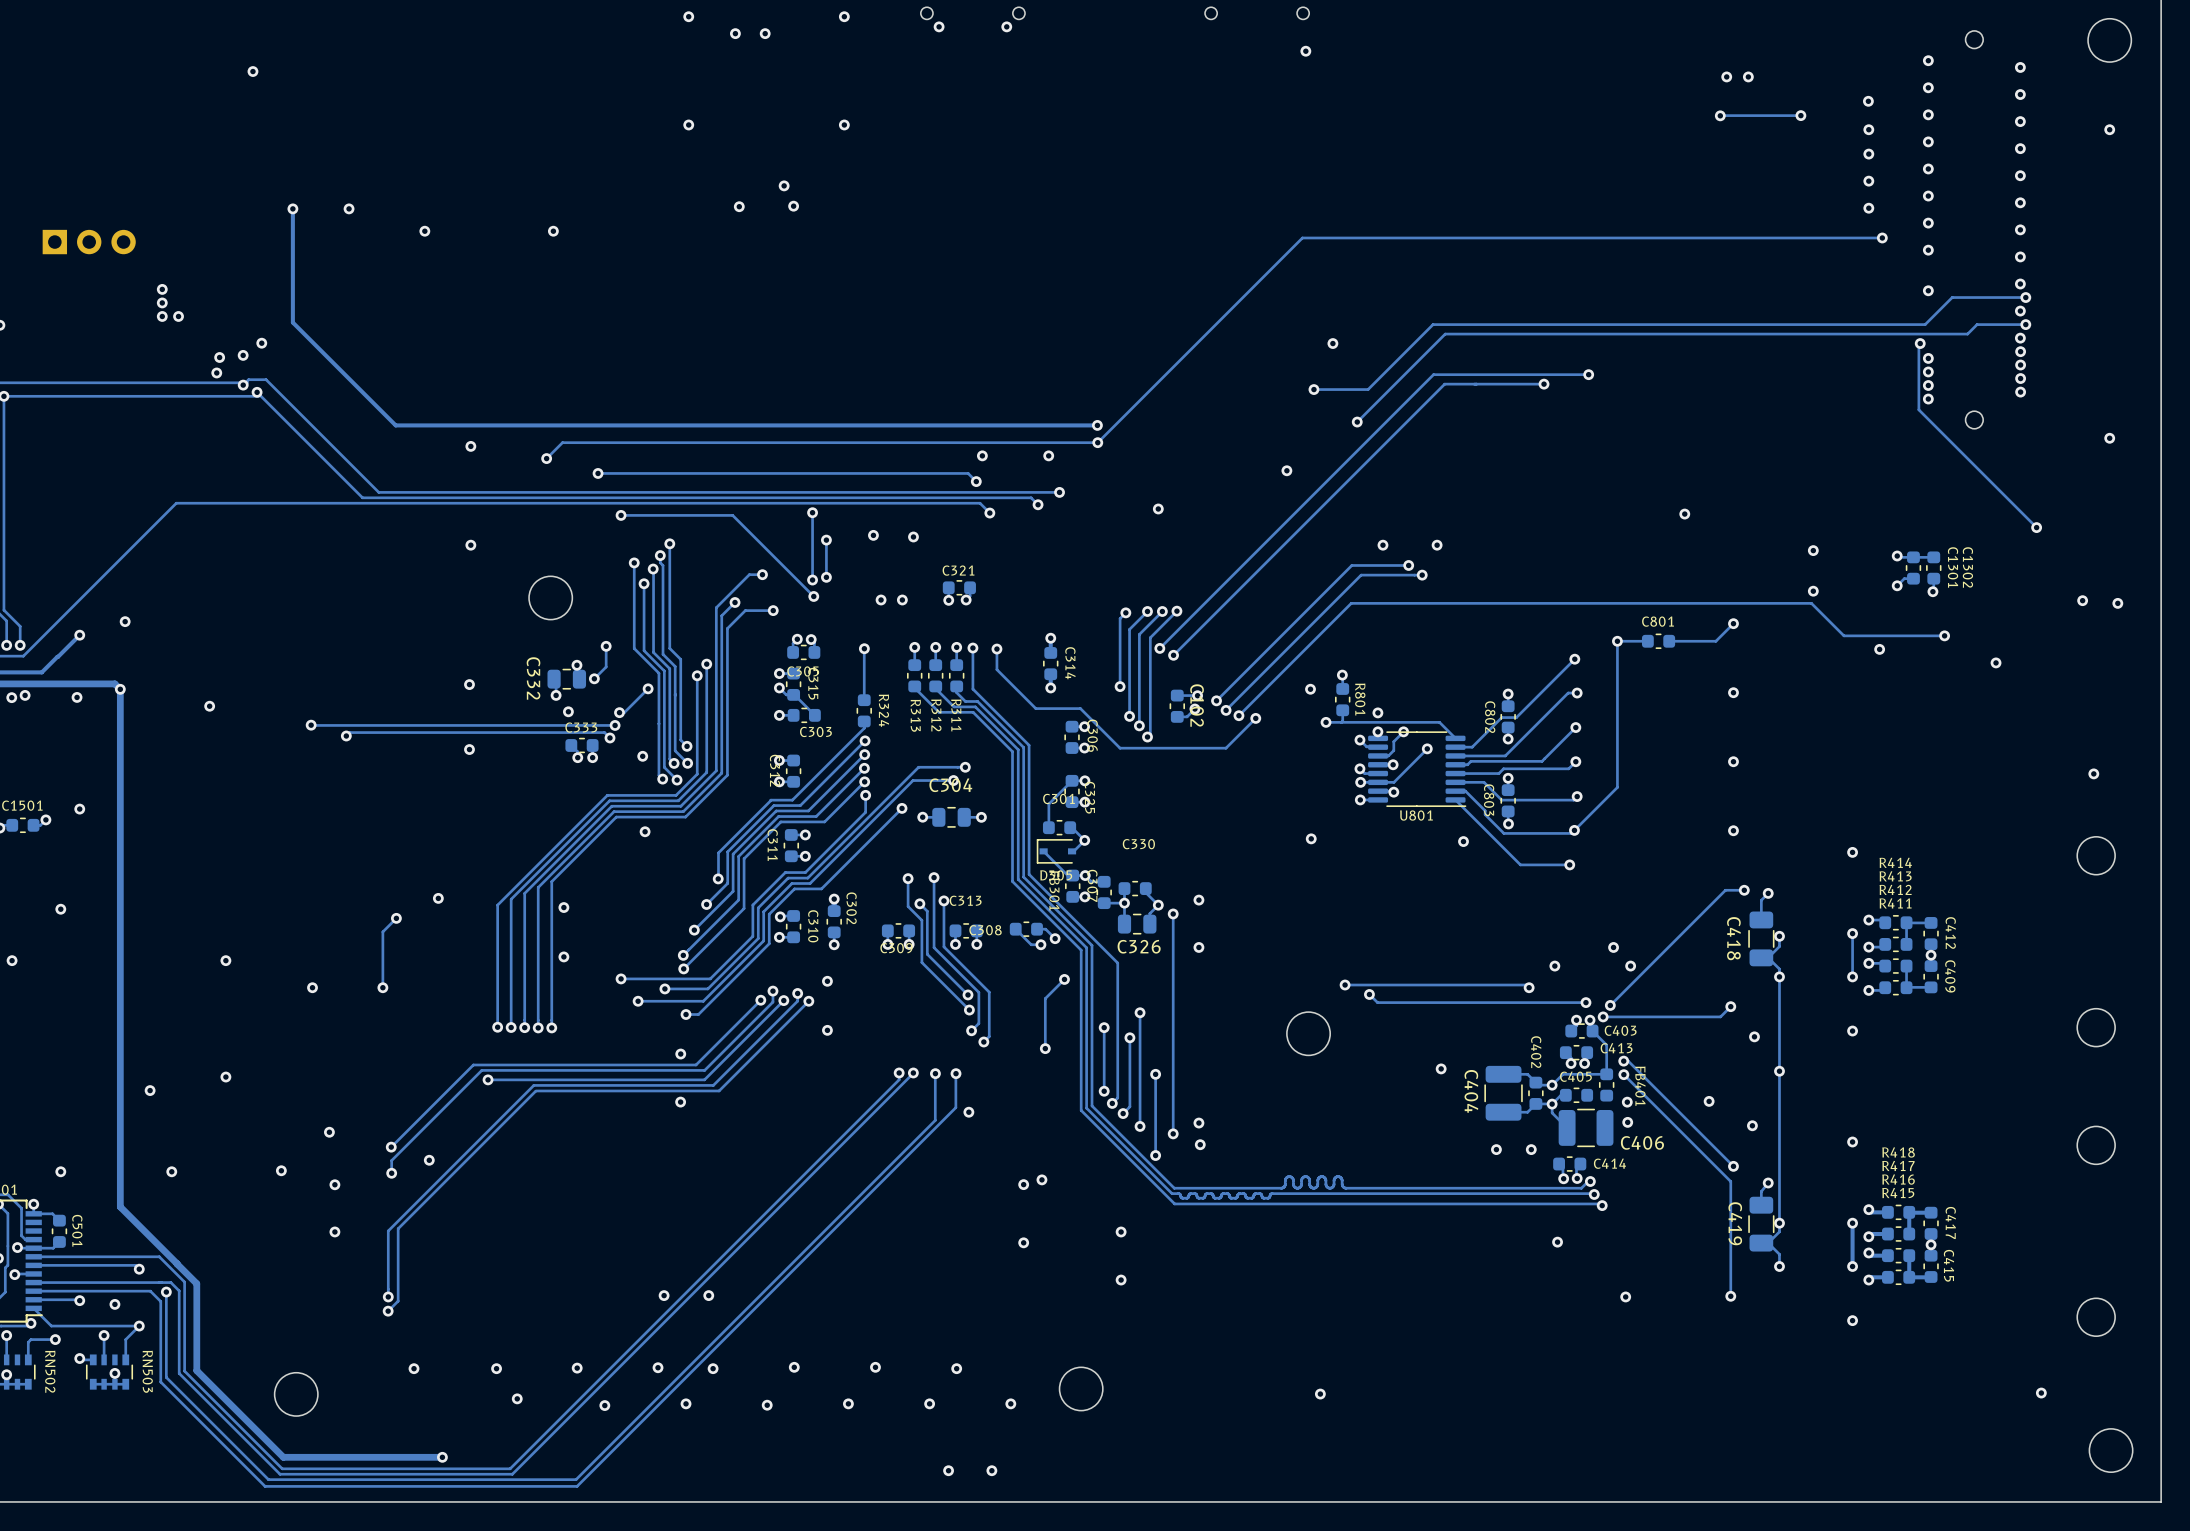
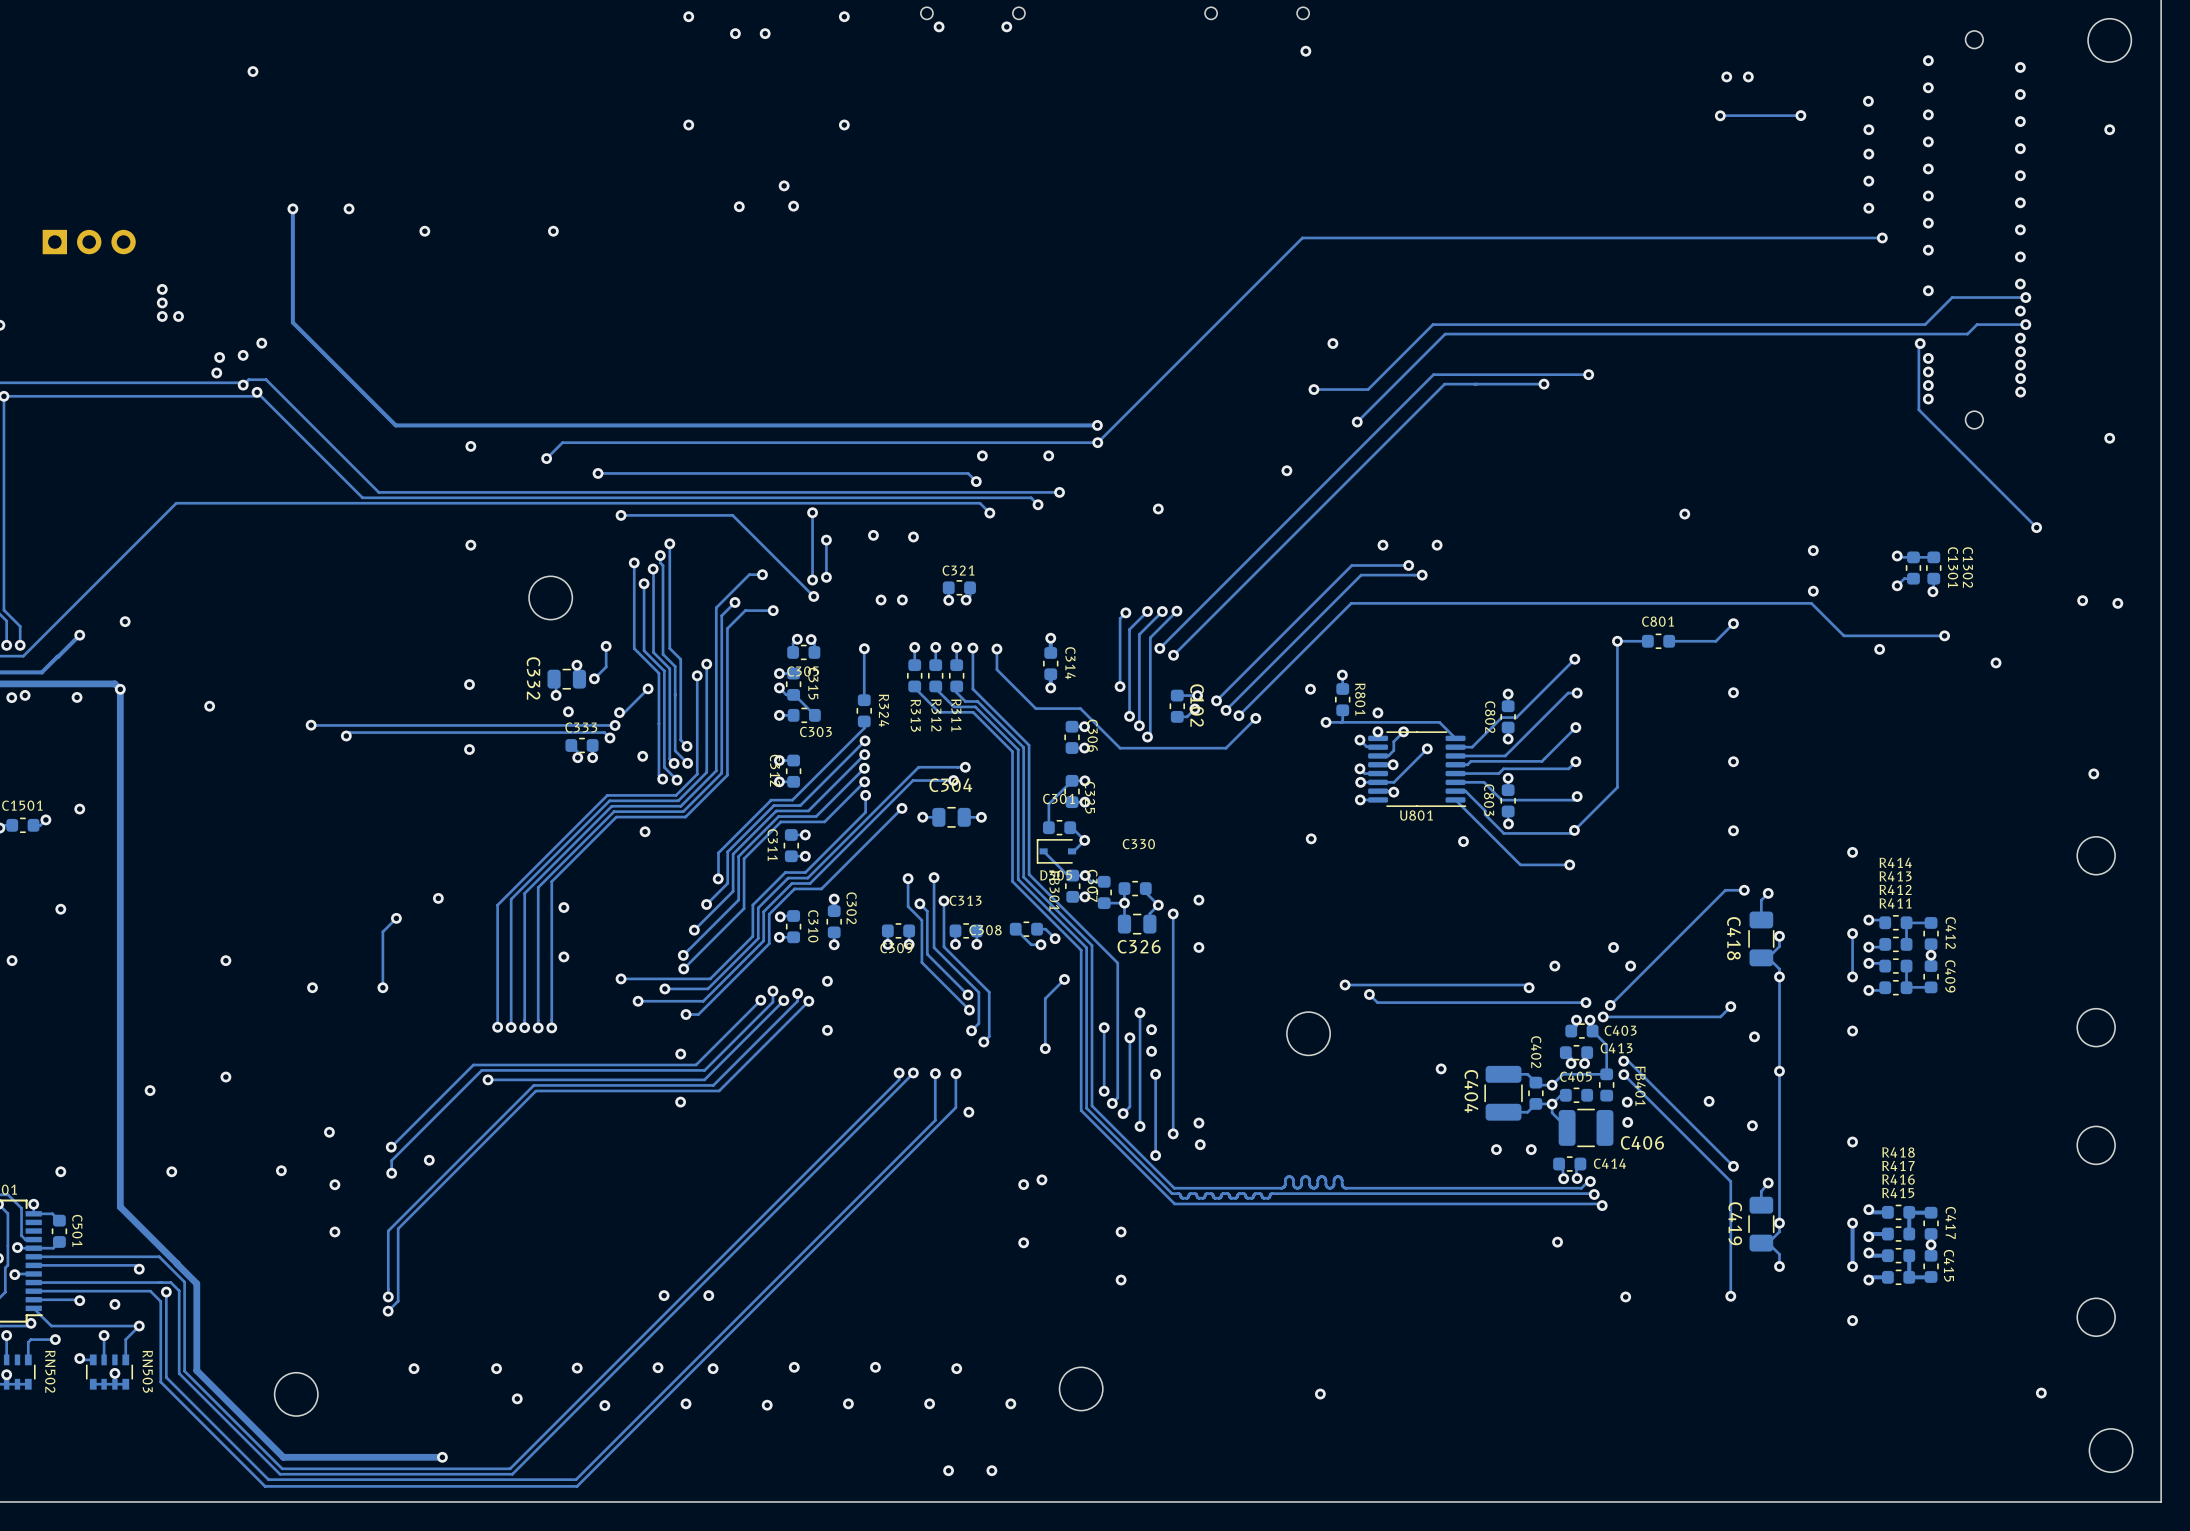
via: none -> (1151, 1029)
via: none -> (1151, 1051)

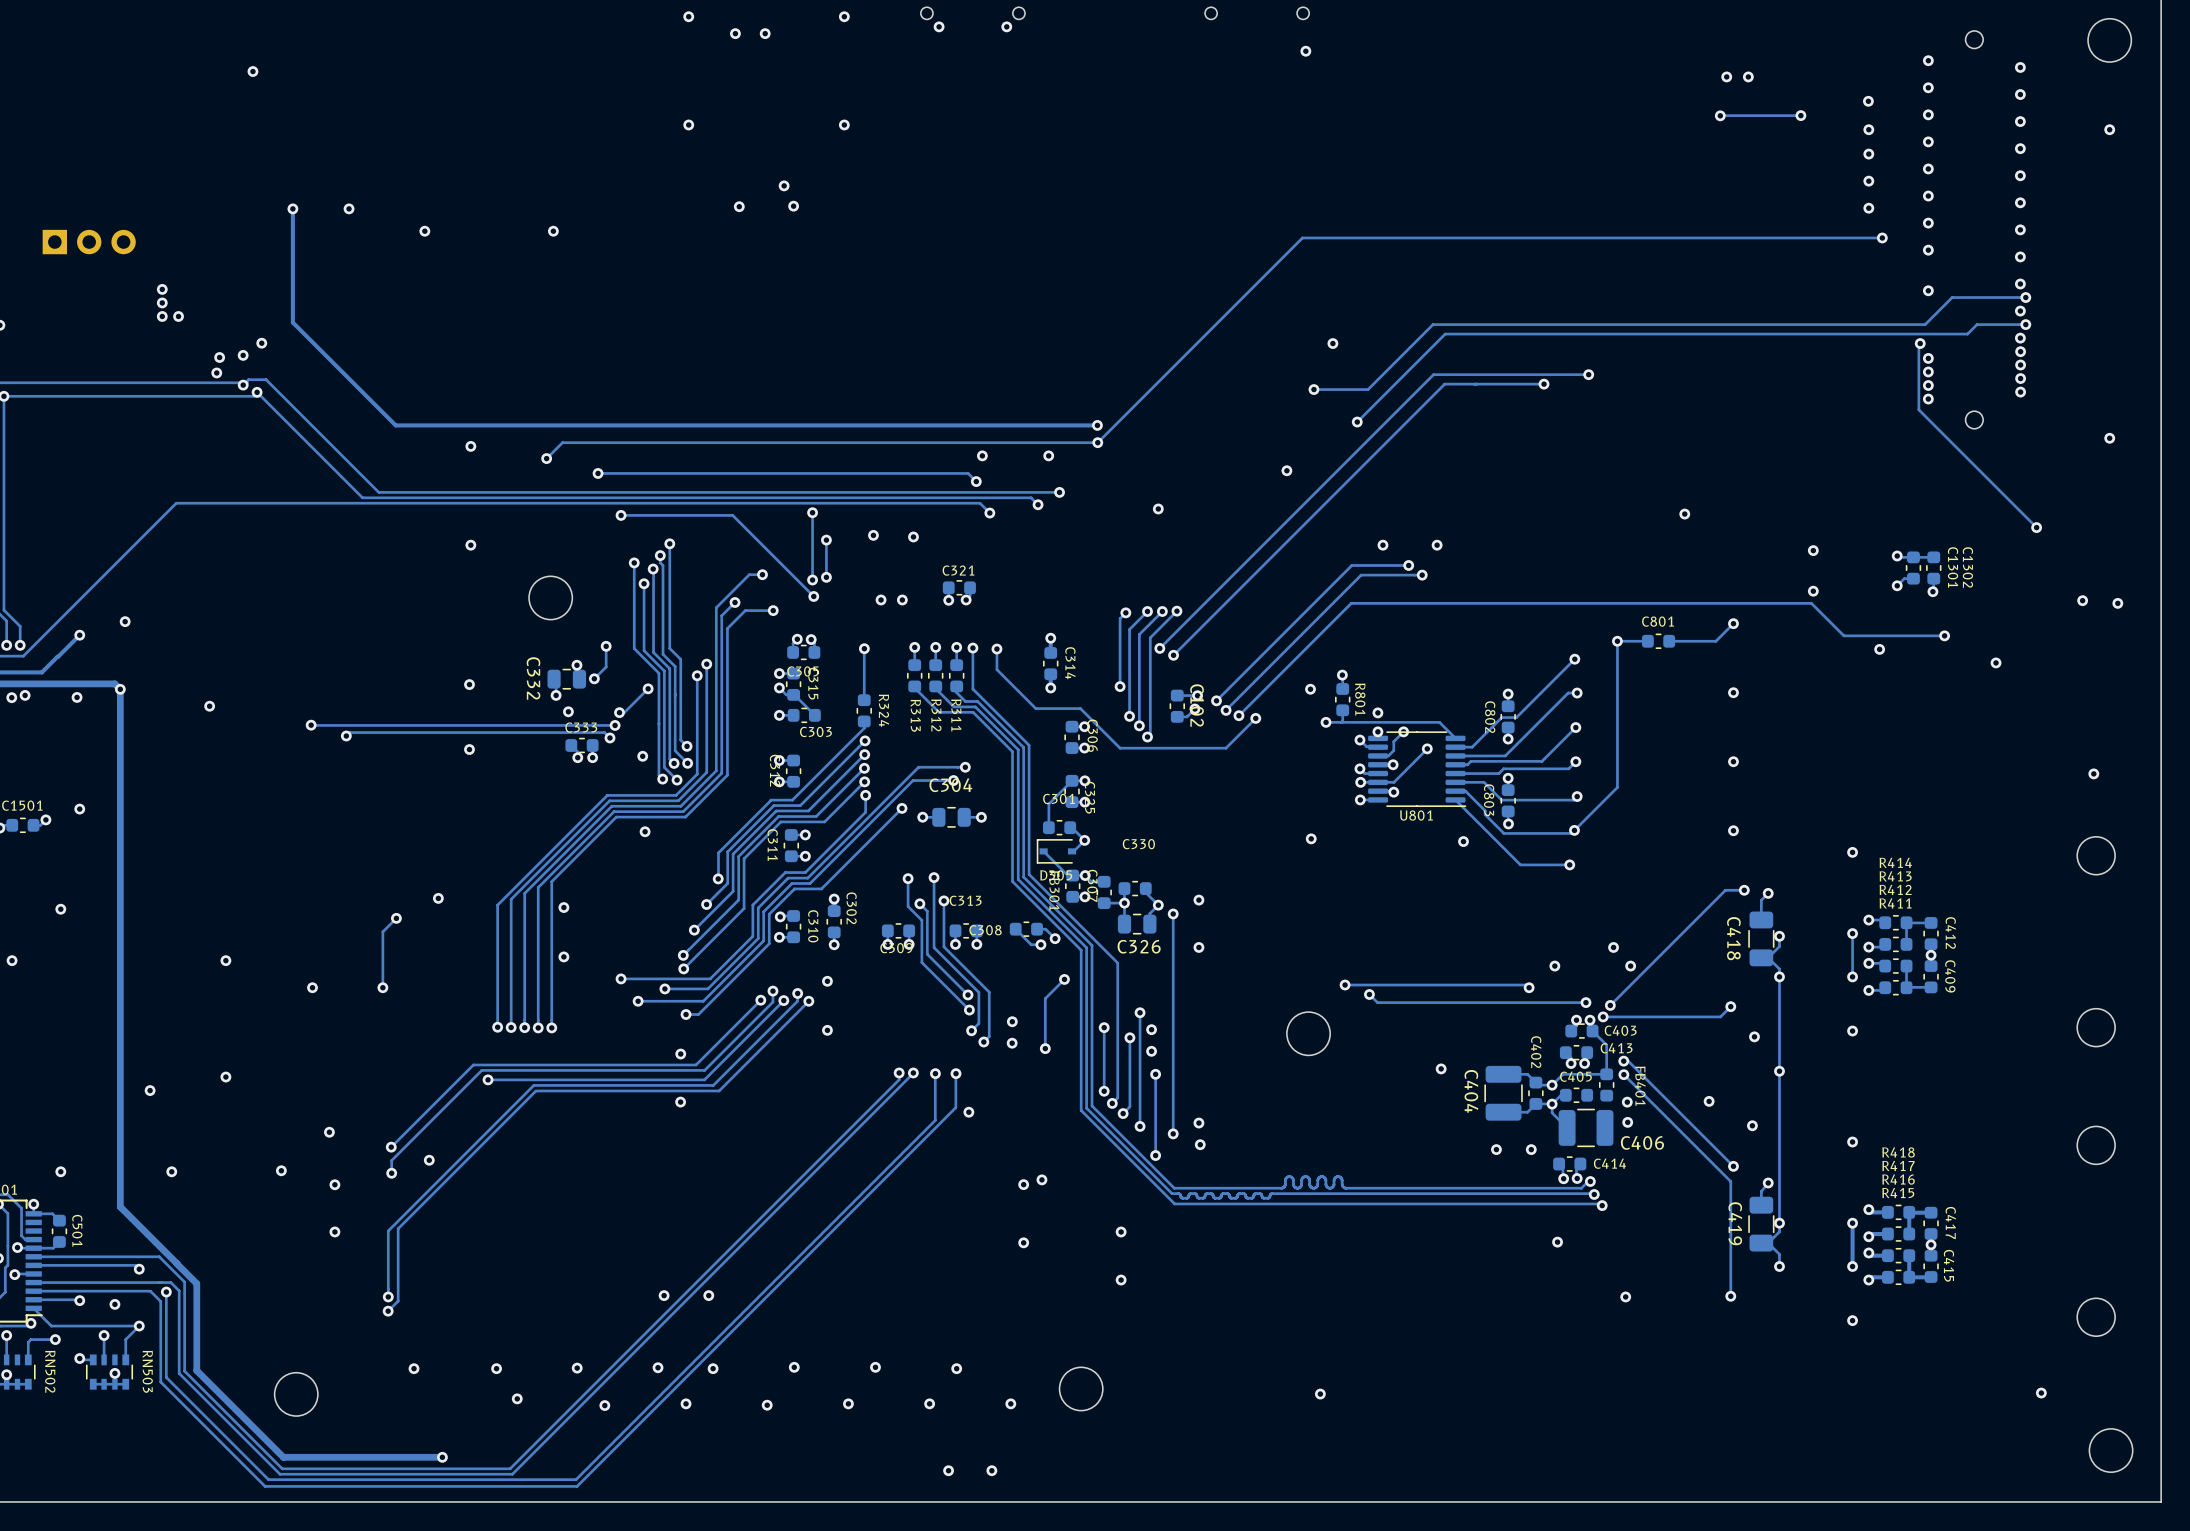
via: none -> (1012, 1021)
via: none -> (1012, 1043)

